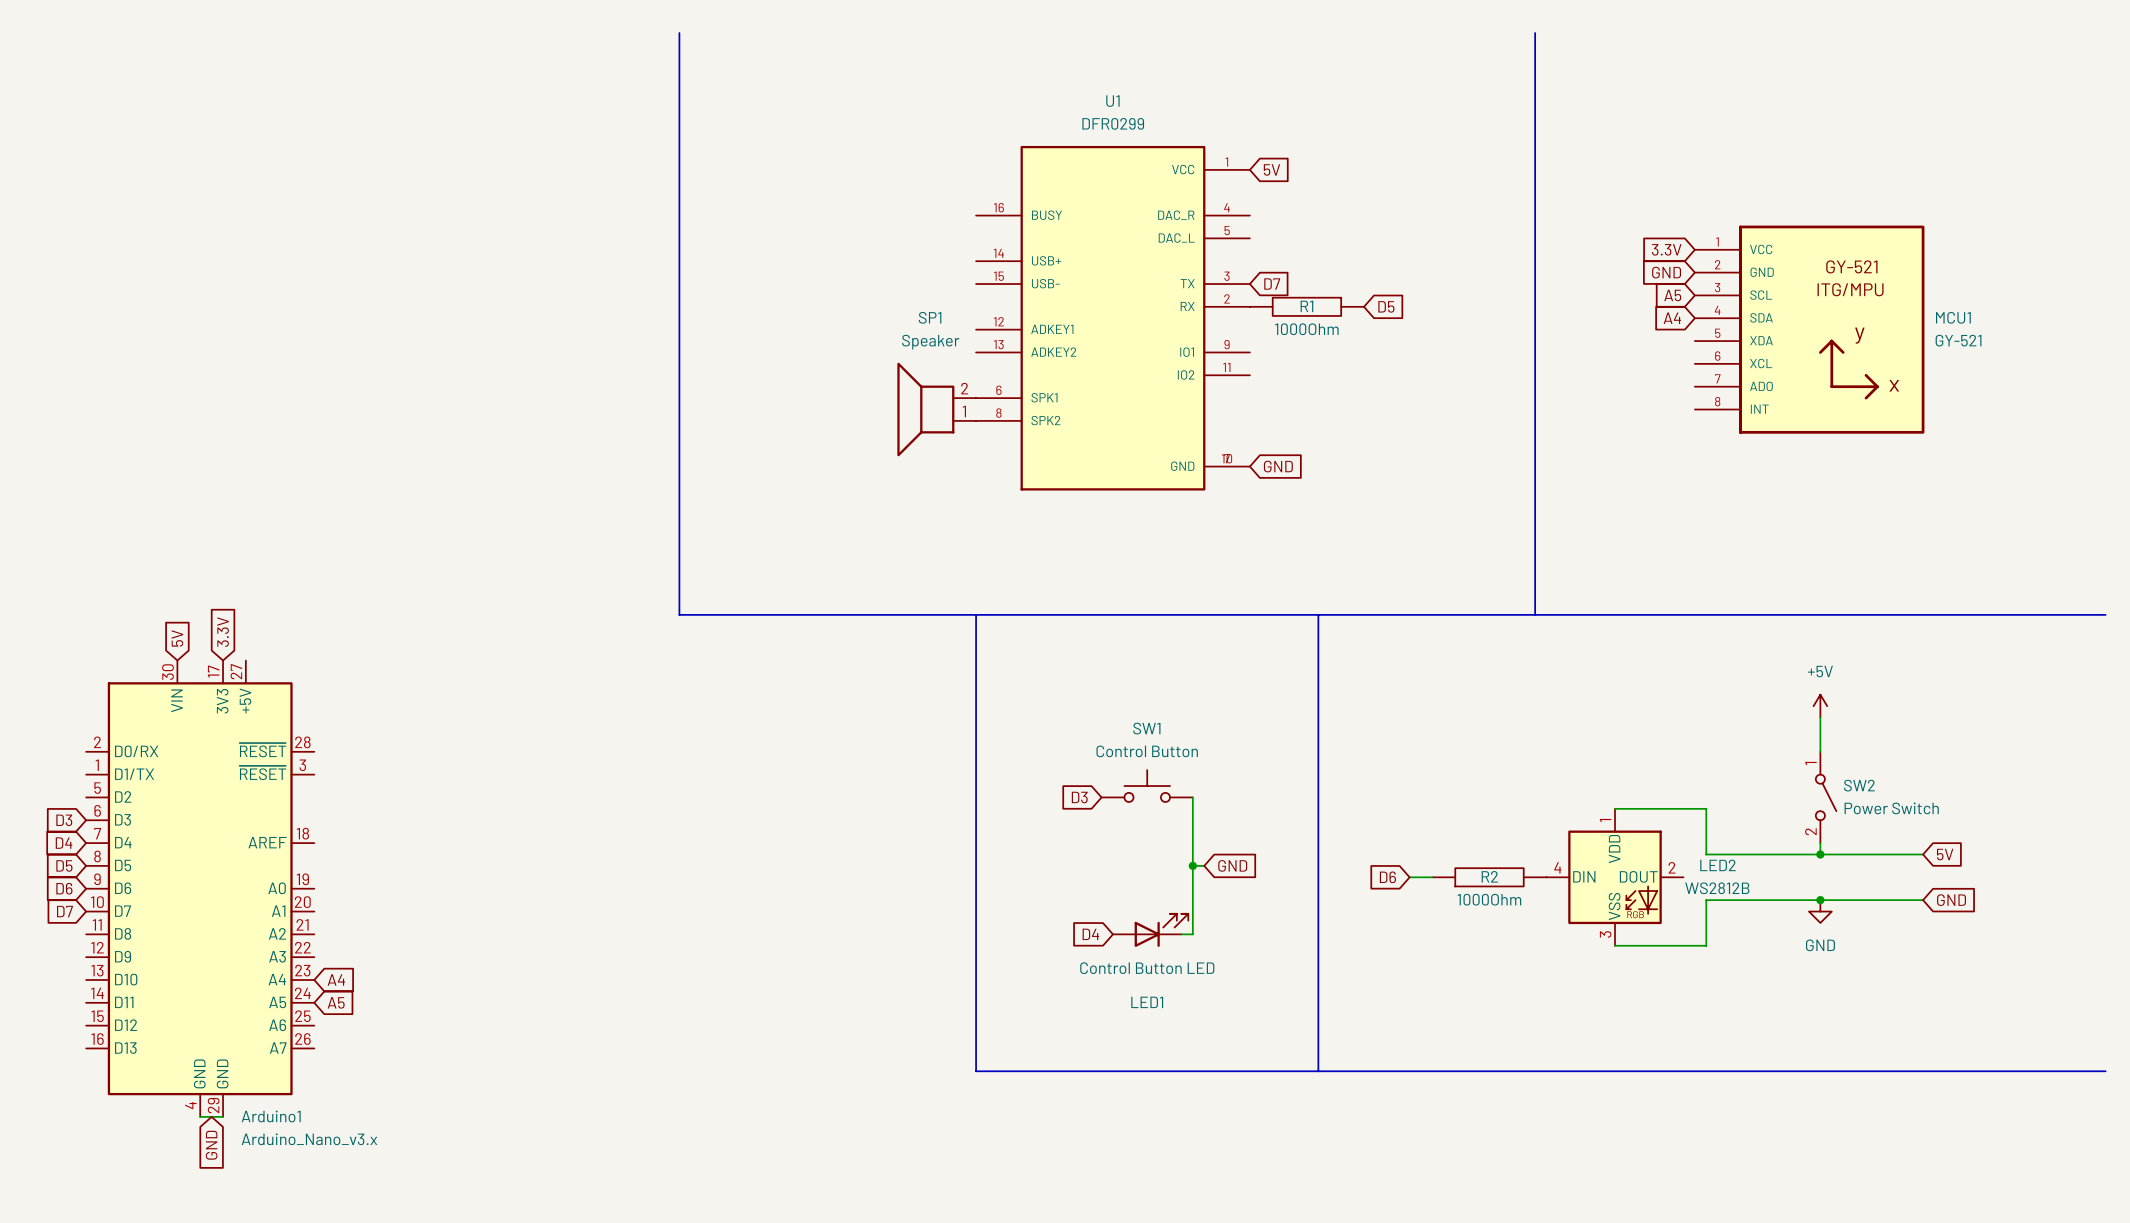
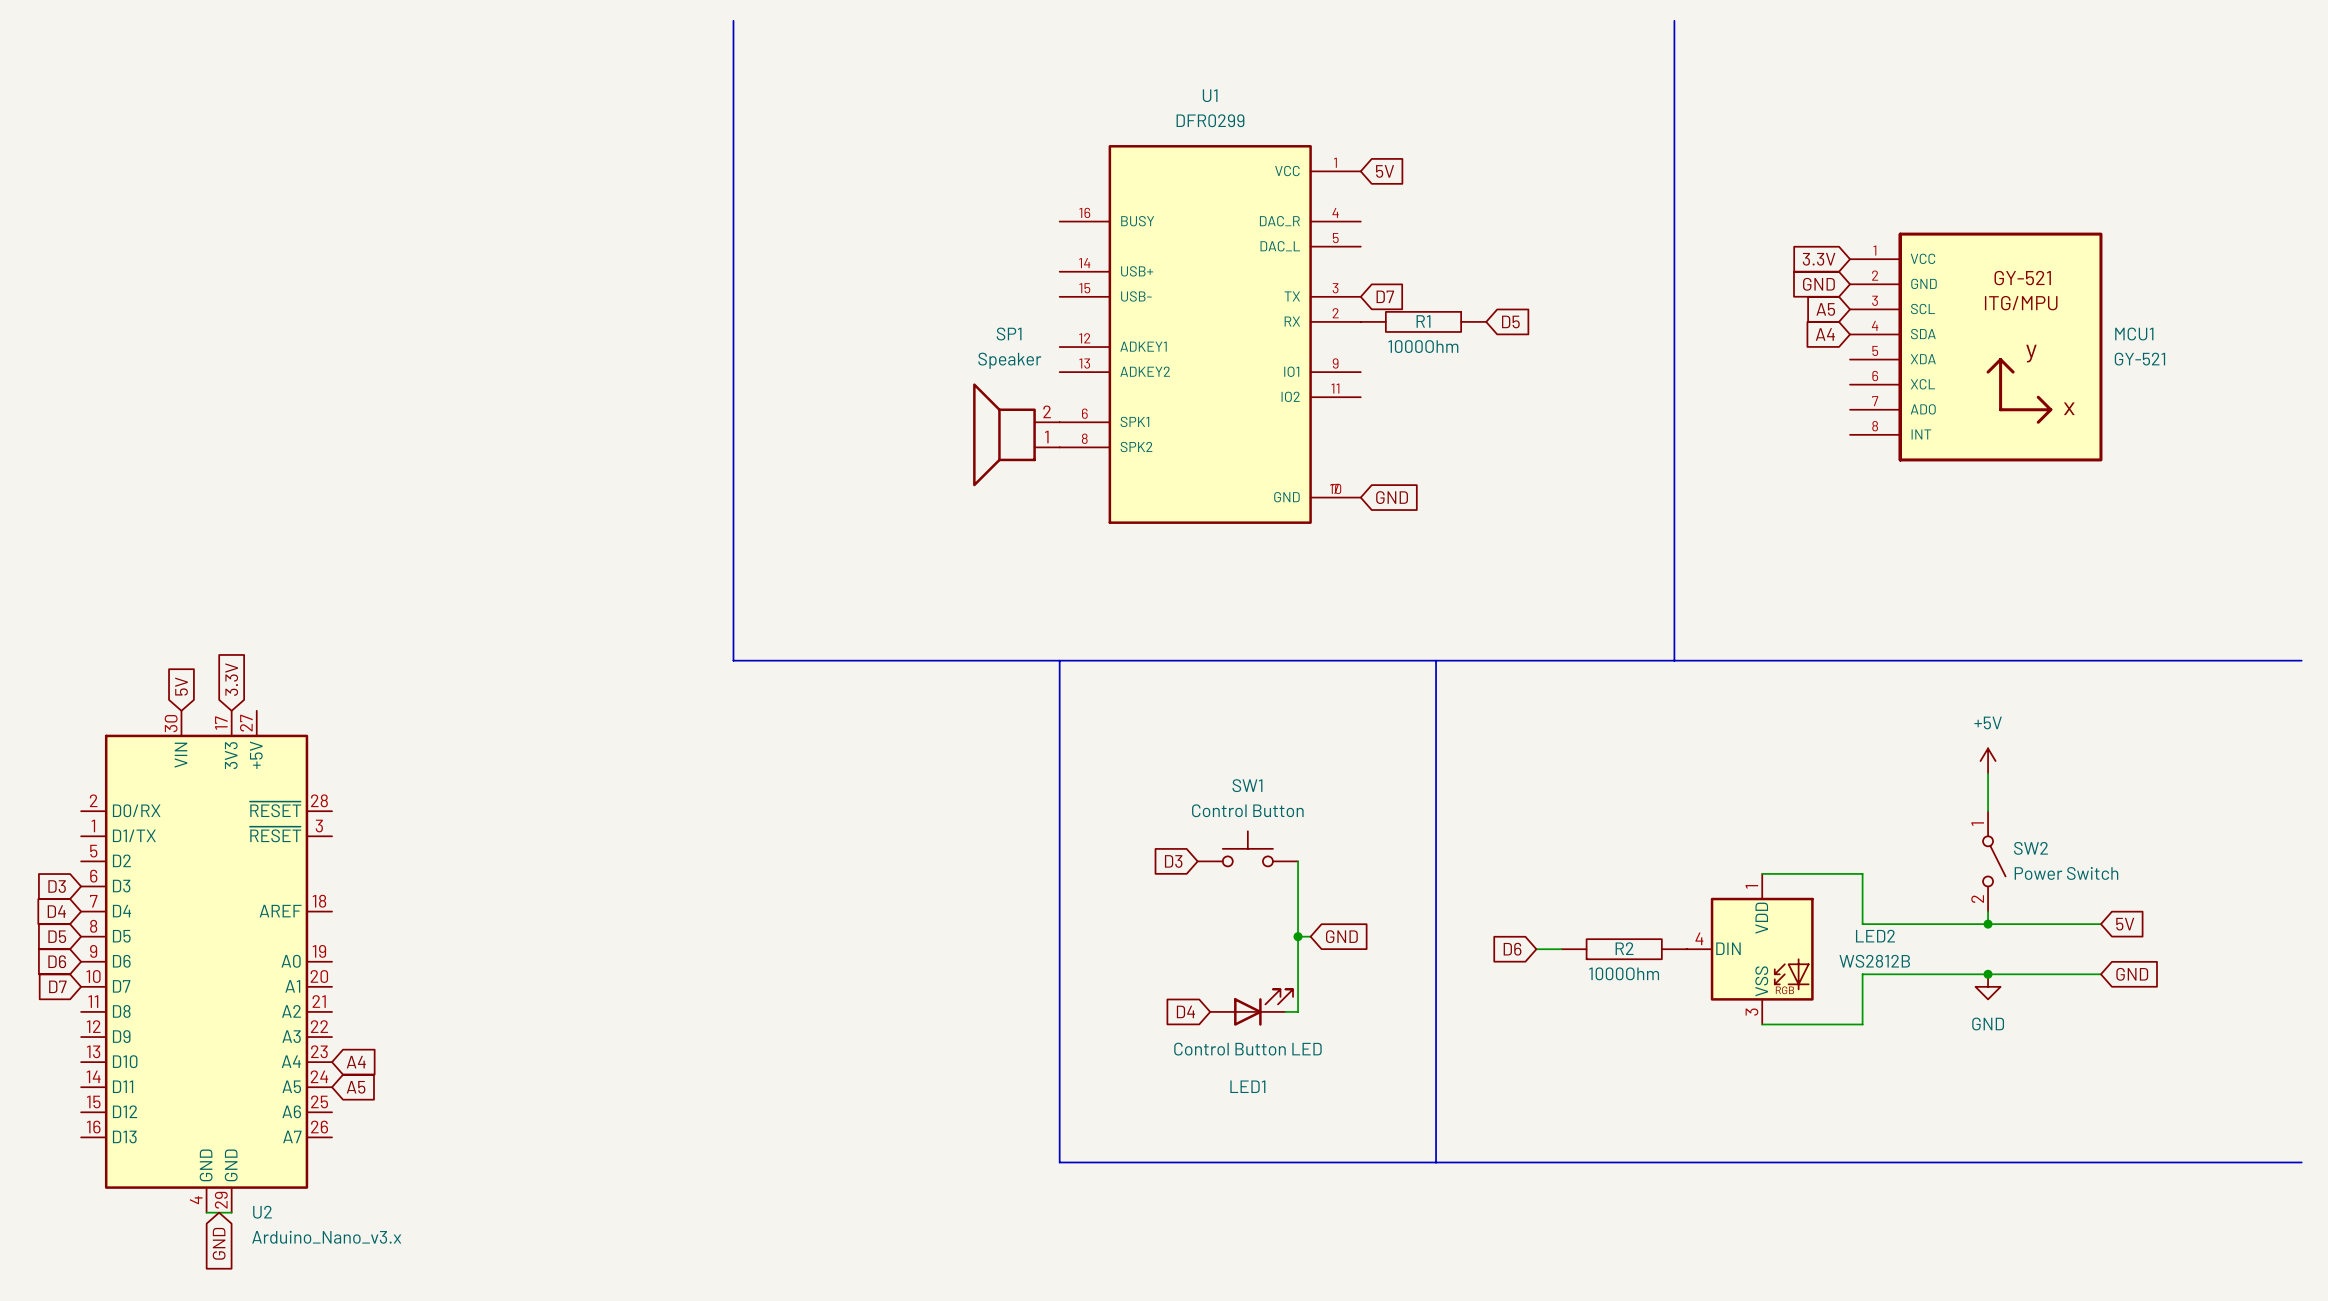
LED2 symbol: [1546, 808, 1684, 946] -> [1686, 873, 1814, 1025]
Arduino1 name: Arduino1 (271, 1116) -> U2 (262, 1212)

